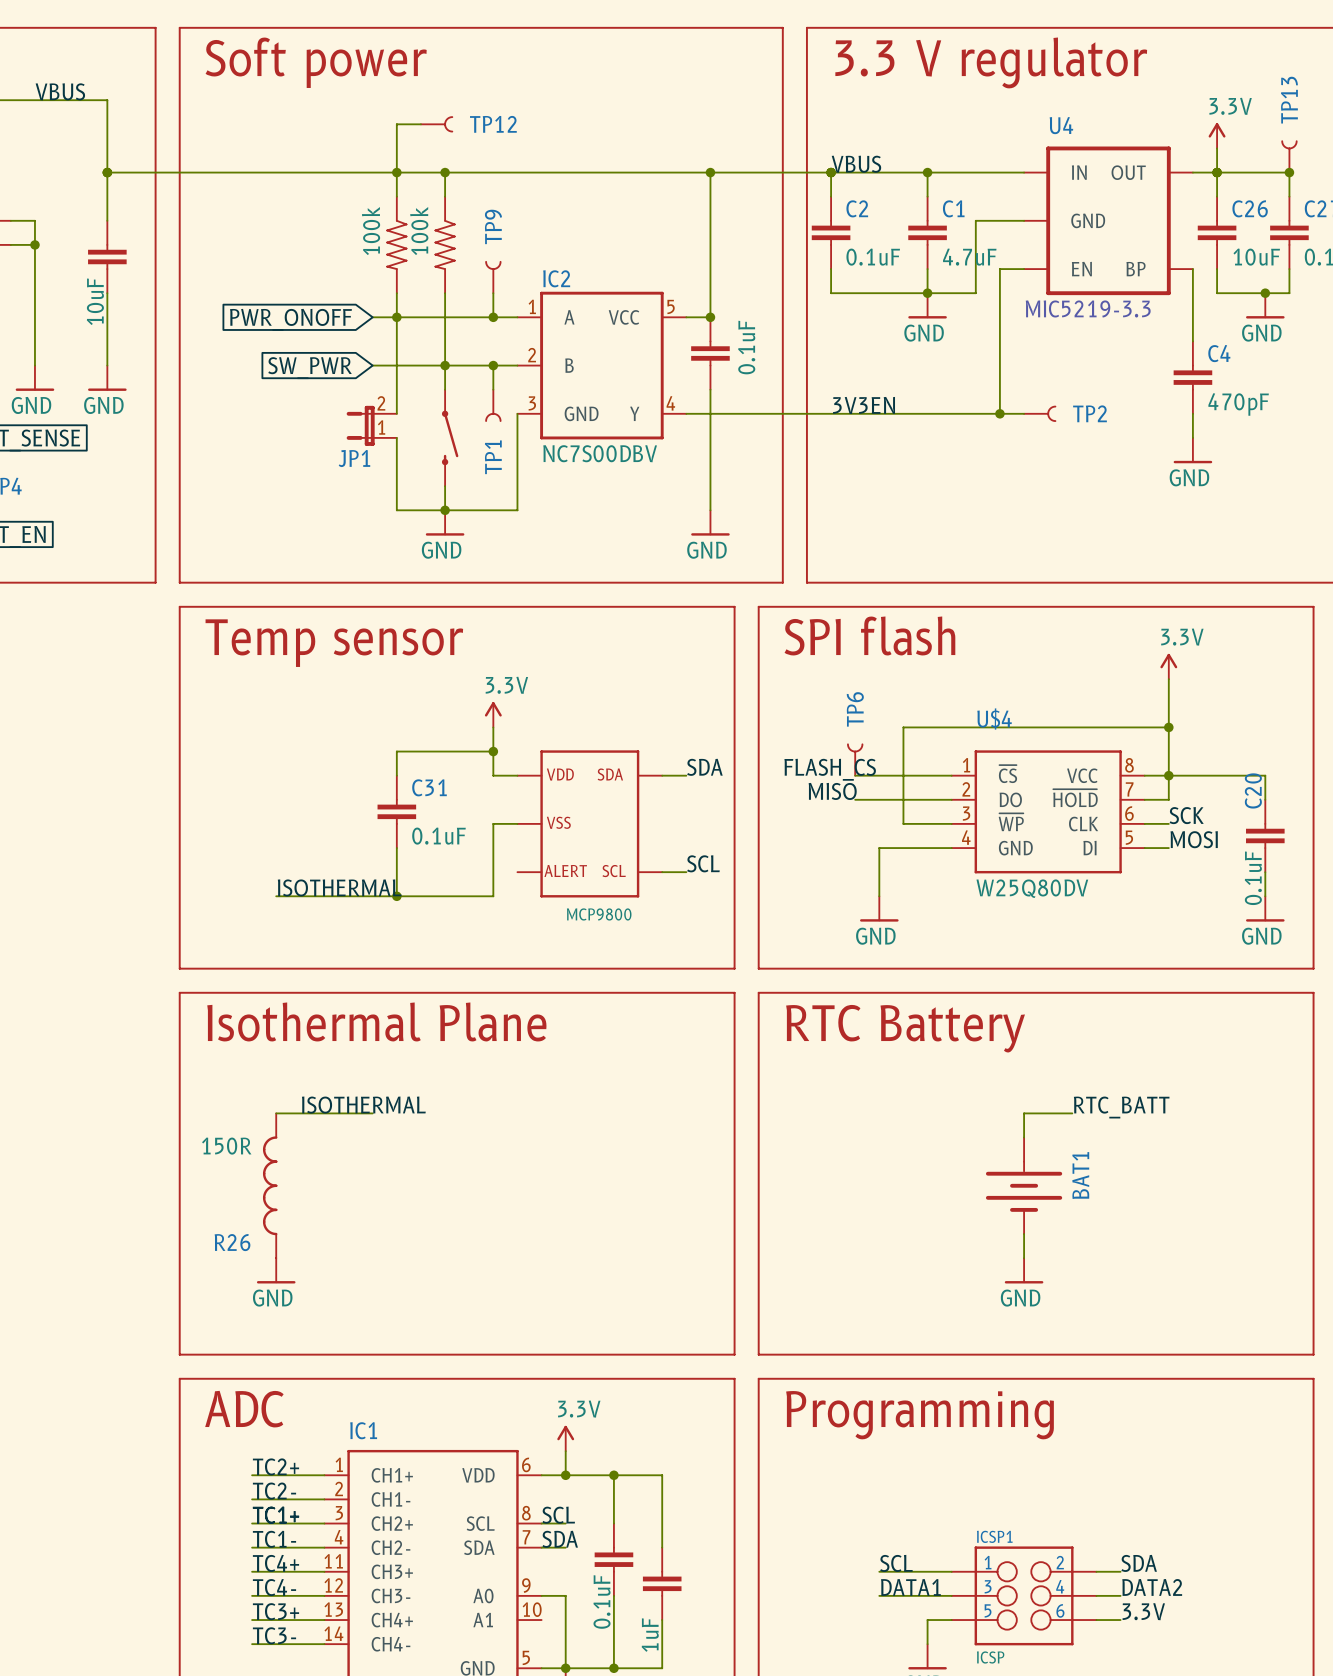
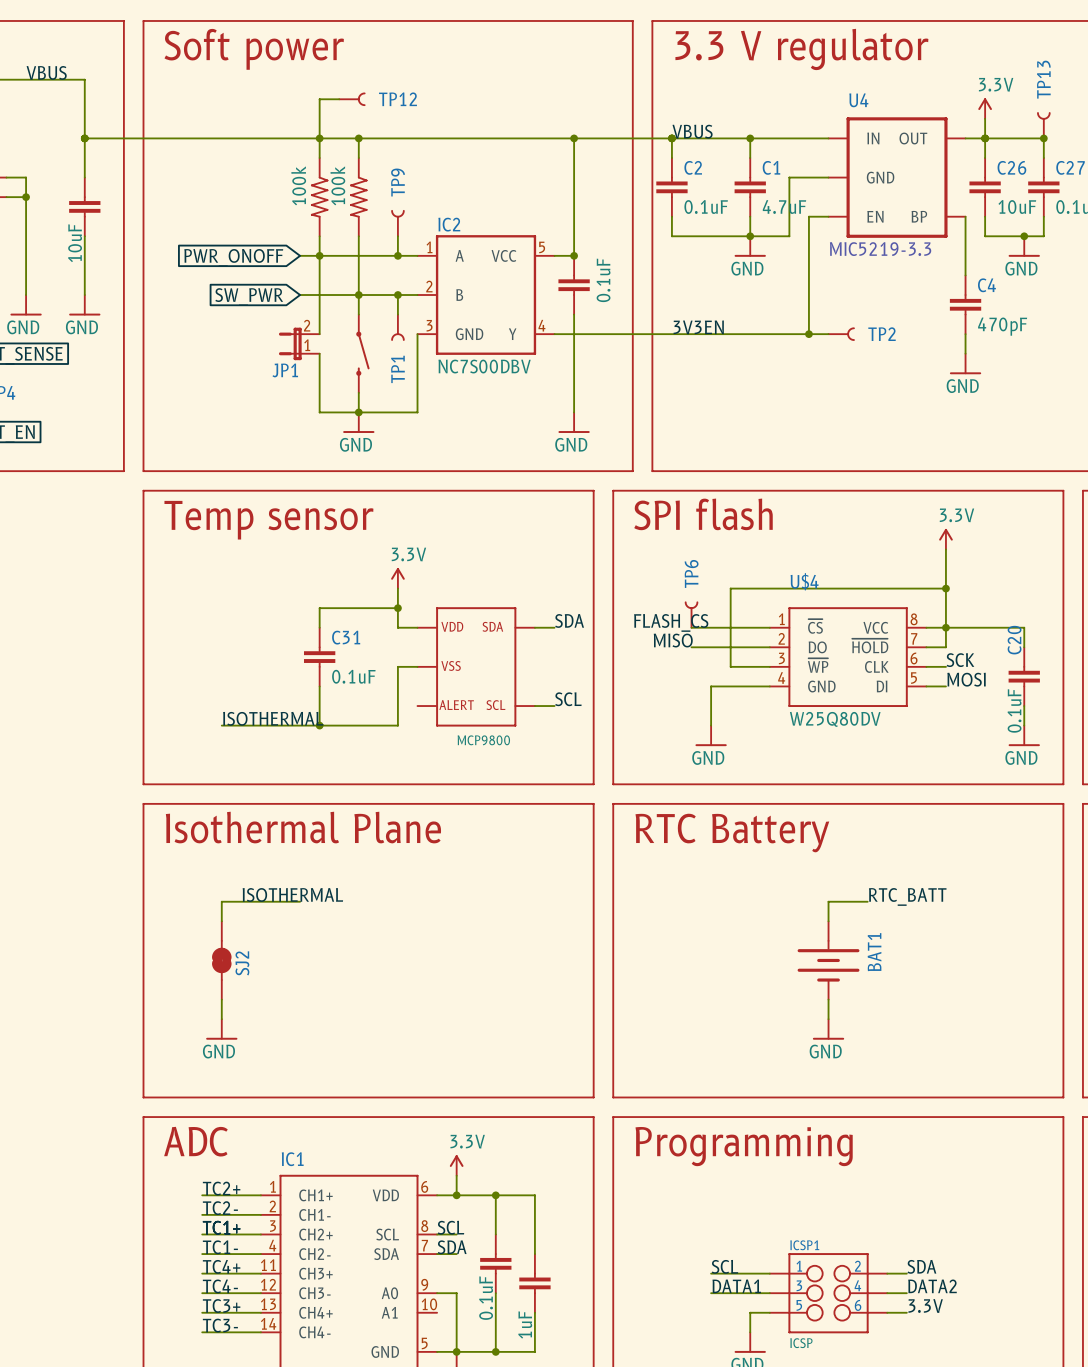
R26: 150R (270, 1185) -> none
SJ2: none -> (221, 960)

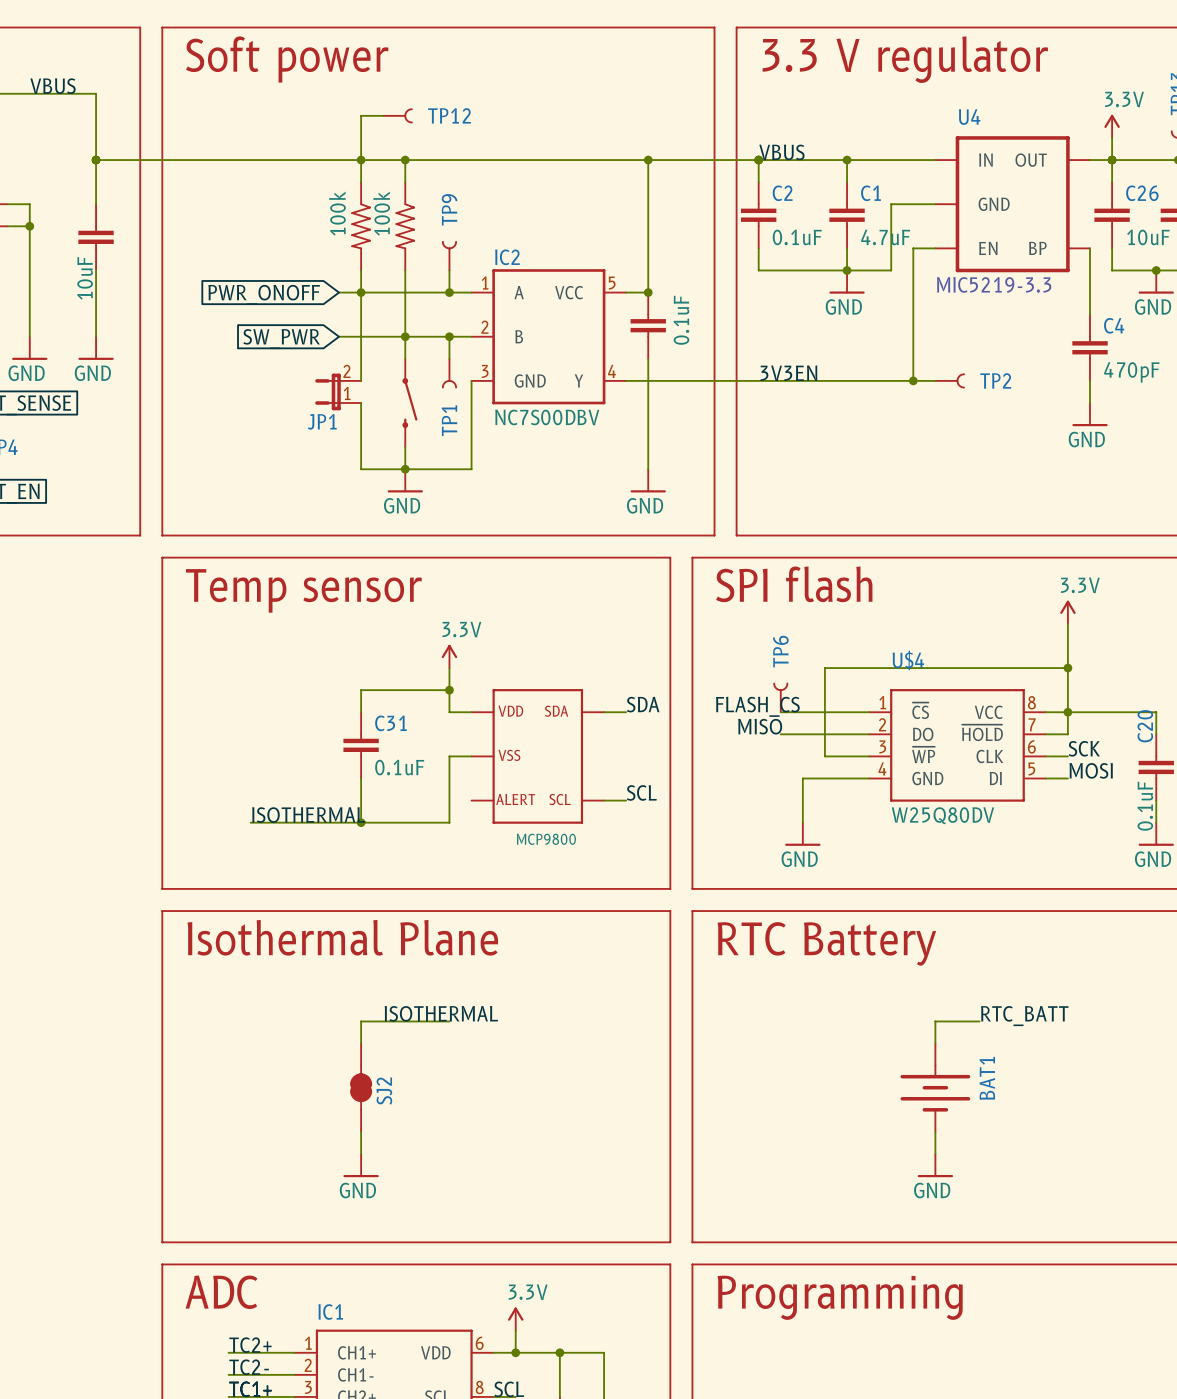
label position: ISOTHERMAL (292, 894) -> ISOTHERMAL (441, 1013)
wire: (300, 901) (221, 901) (221, 921) -> (449, 1021) (361, 1021) (361, 1043)
SJ2 position: (221, 960) -> (361, 1087)
wire: (221, 999) (221, 1019) -> (361, 1131) (361, 1153)
power symbol position: GND (221, 1029) -> GND (361, 1165)

